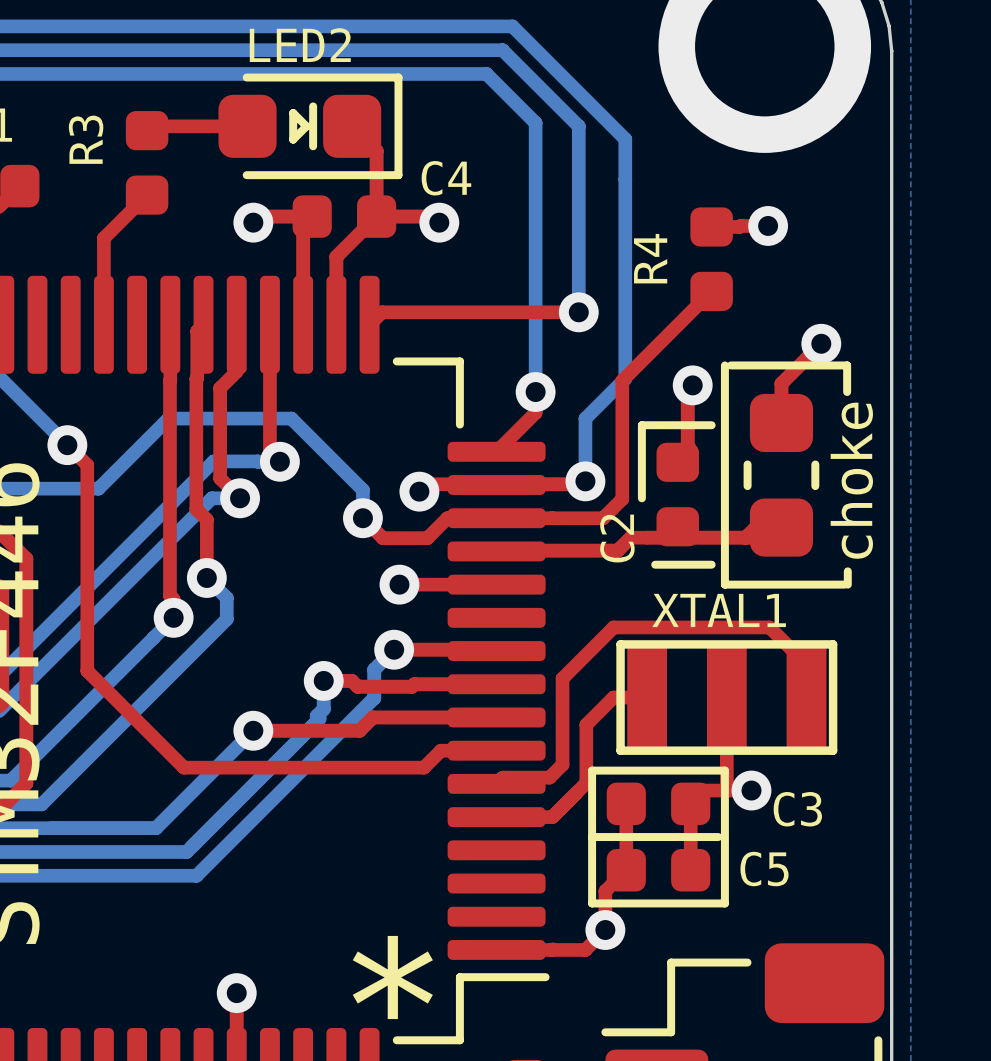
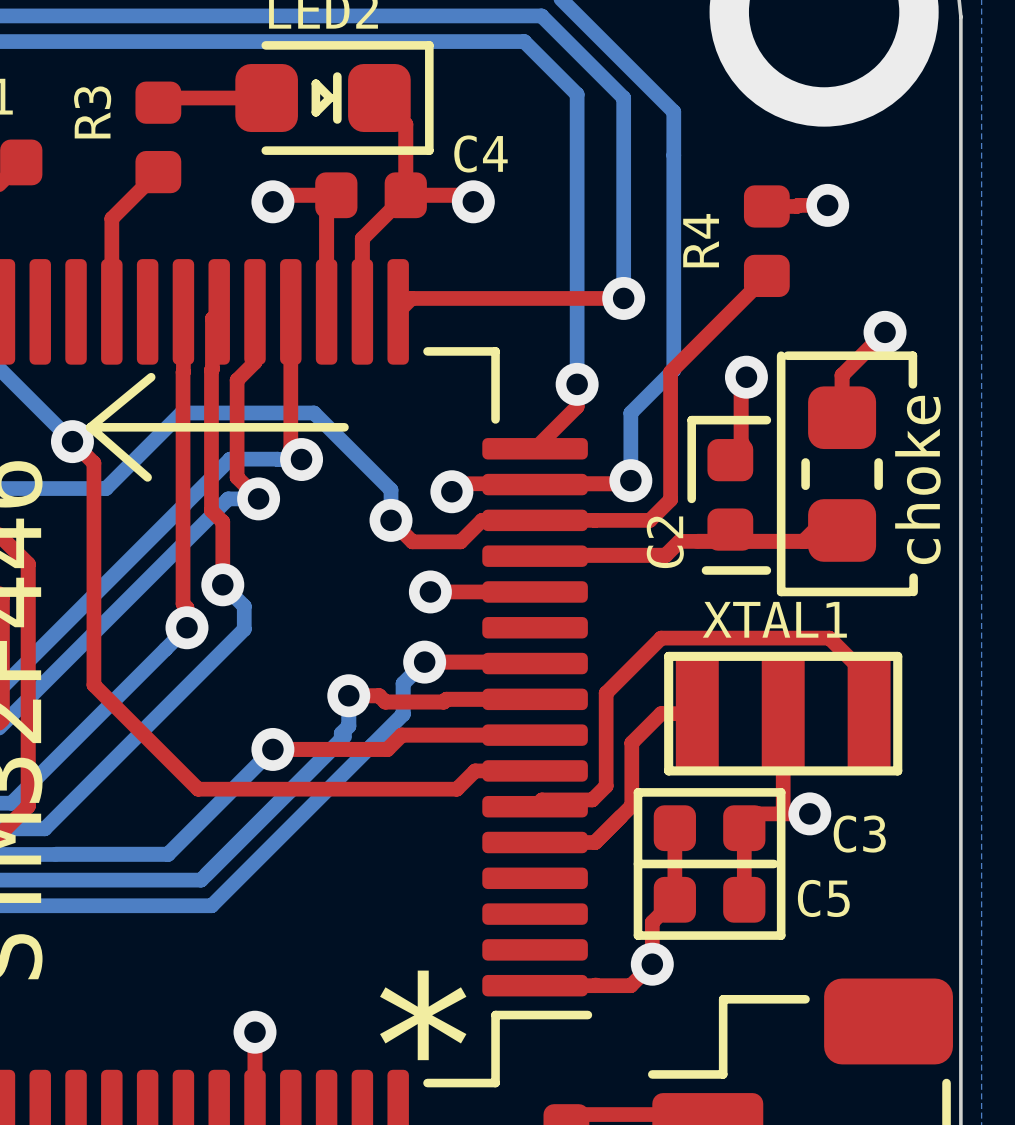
line: none -> (151, 377) (90, 427)
line: none -> (90, 427) (147, 477)
line: none -> (90, 427) (344, 427)

